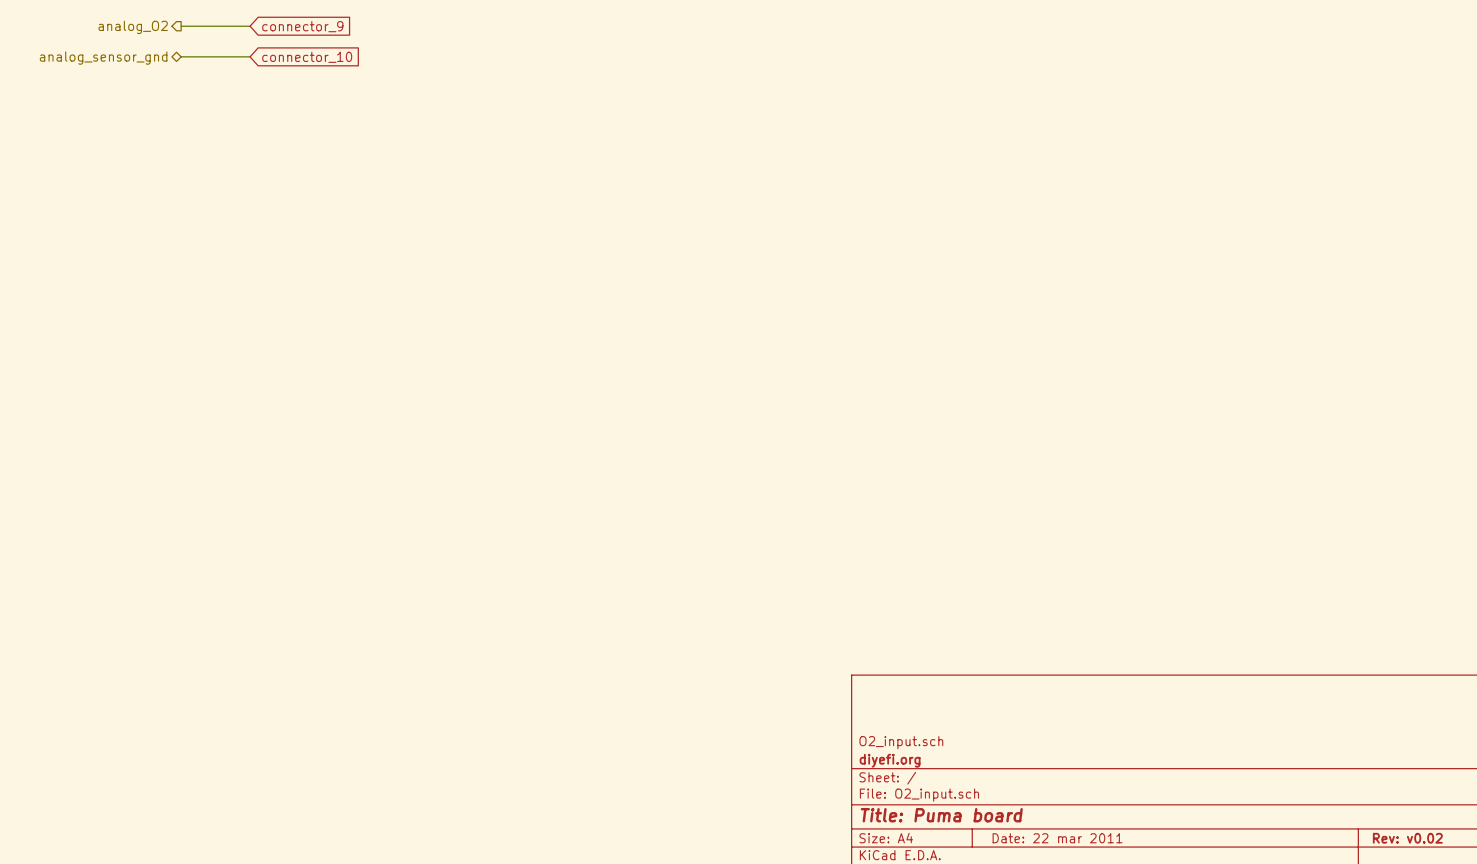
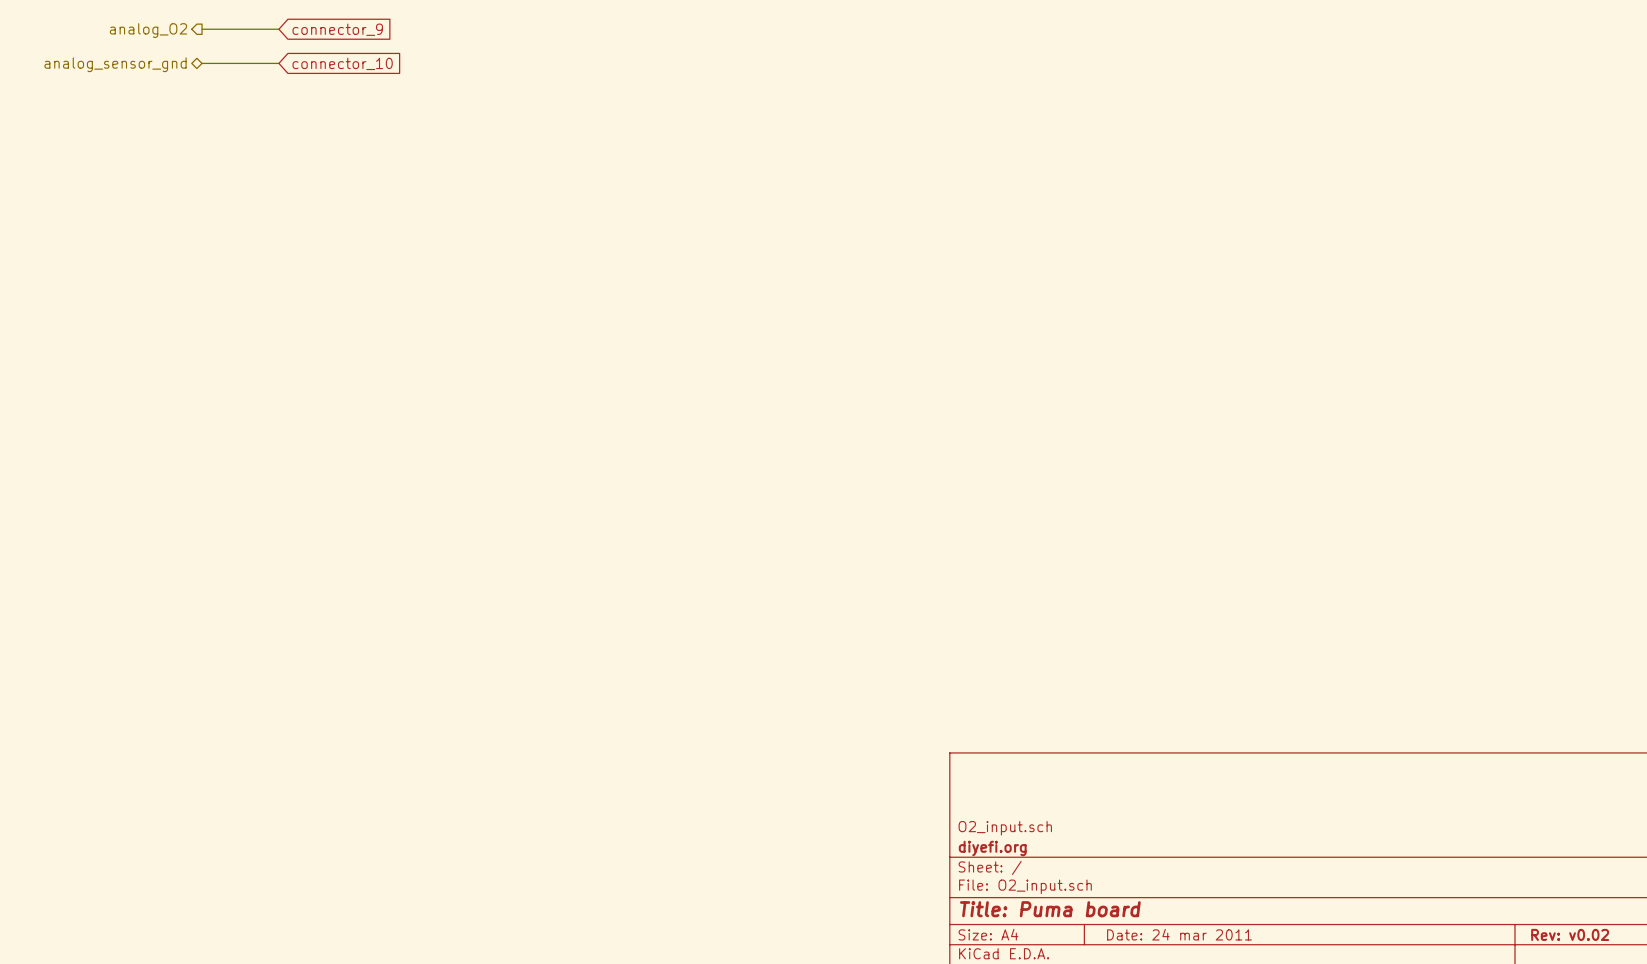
title block: Date: 22 mar 2011 (1057, 838) -> Date: 24 mar 2011 (1179, 934)

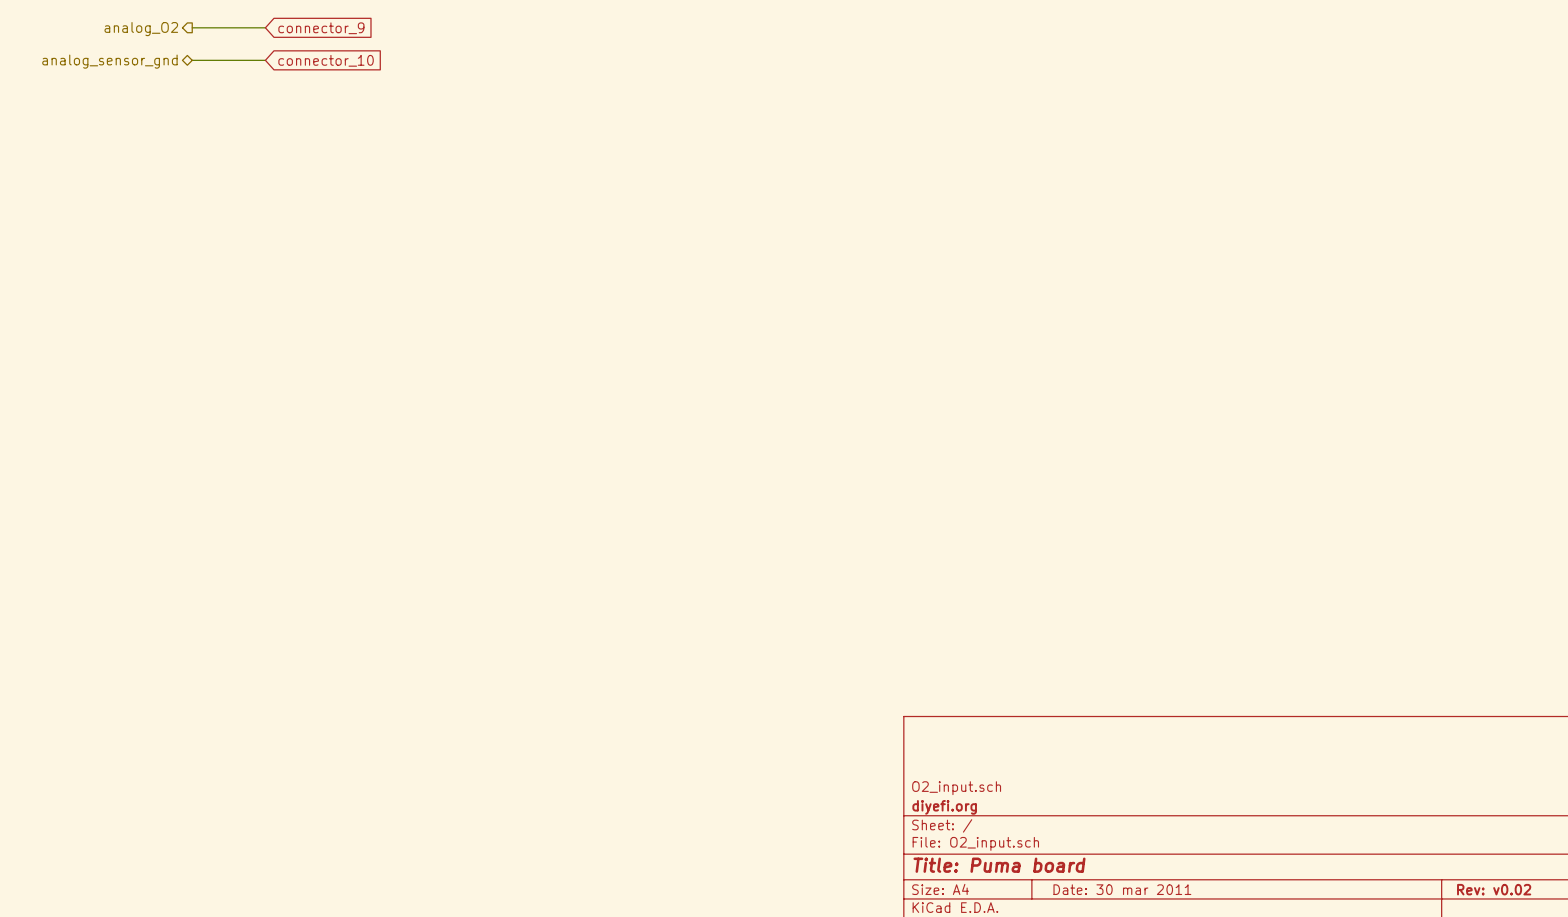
title block: Date: 24 mar 2011 (1179, 934) -> Date: 30 mar 2011 (1122, 889)

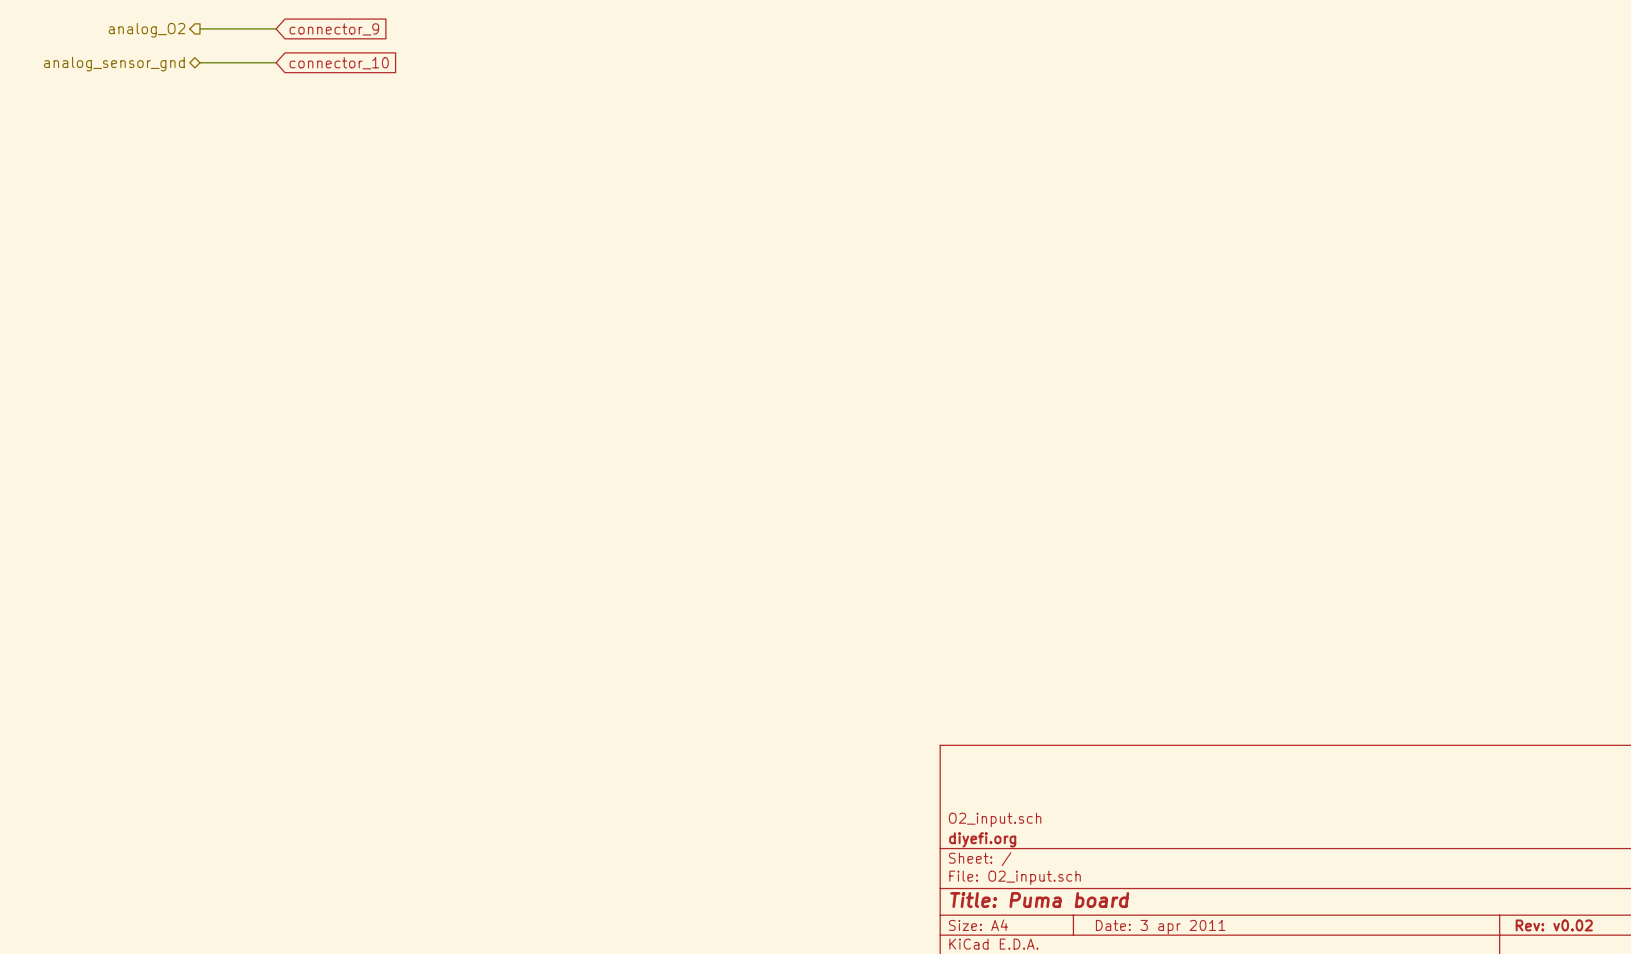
title block: Date: 30 mar 2011 (1122, 889) -> Date: 3 apr 2011 (1160, 927)

